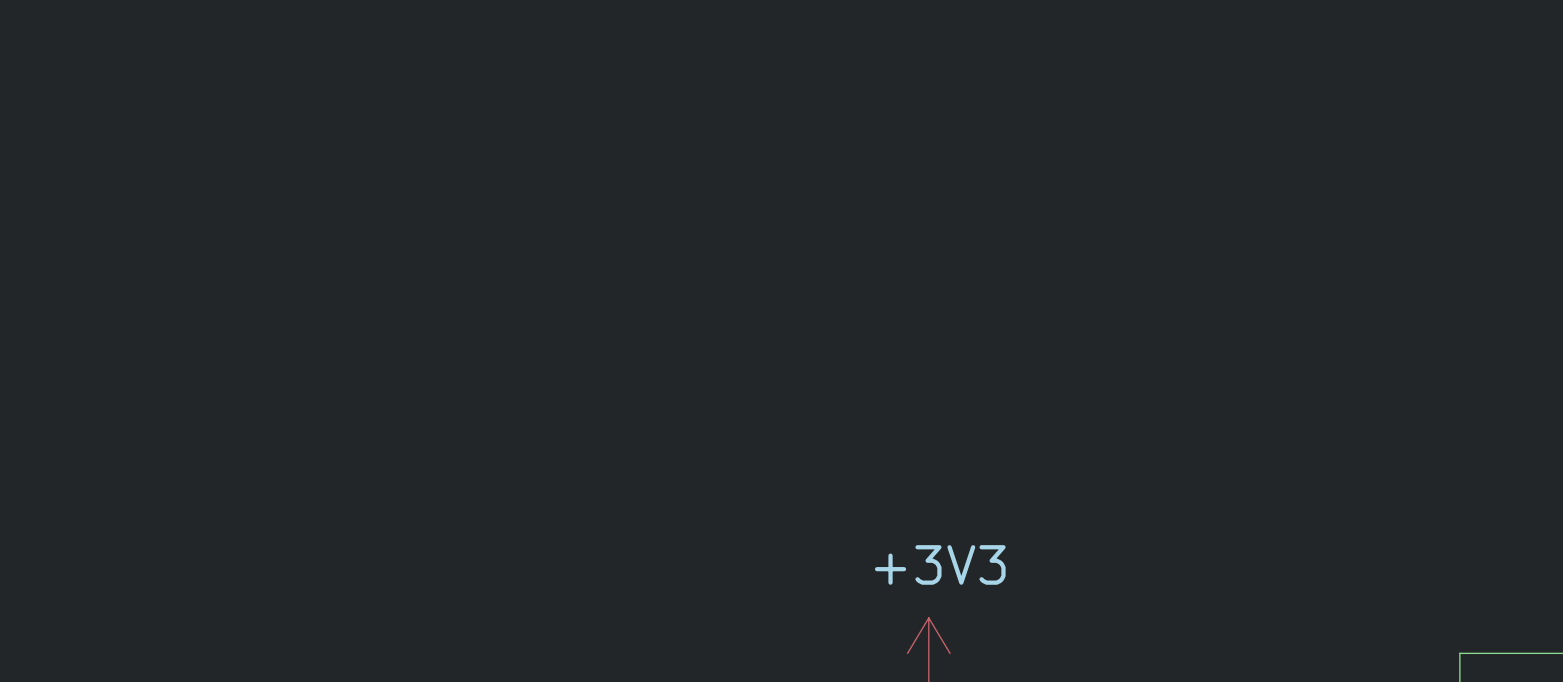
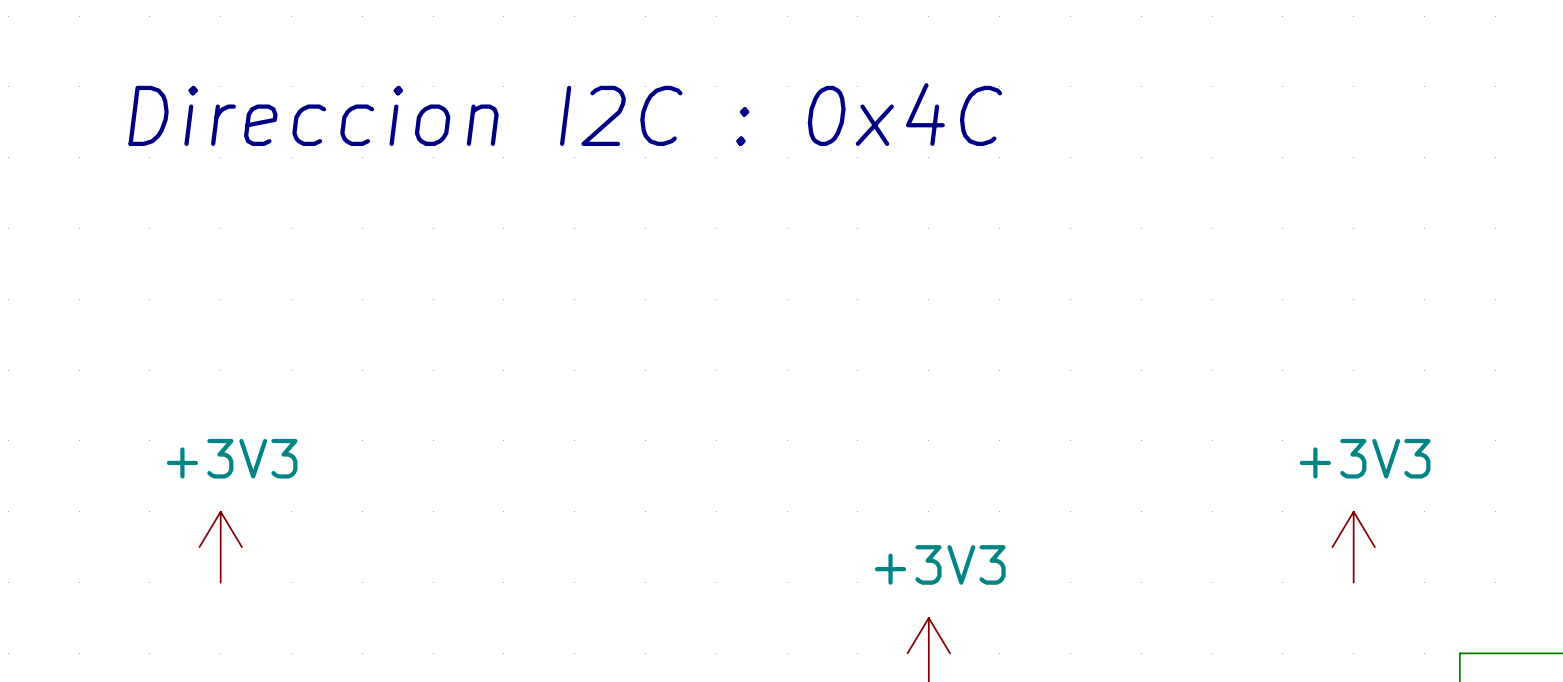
text: none -> Direccion I2C : 0x4C (565, 114)
power symbol: none -> +3V3 (220, 547)
power symbol: none -> +3V3 (1353, 547)

